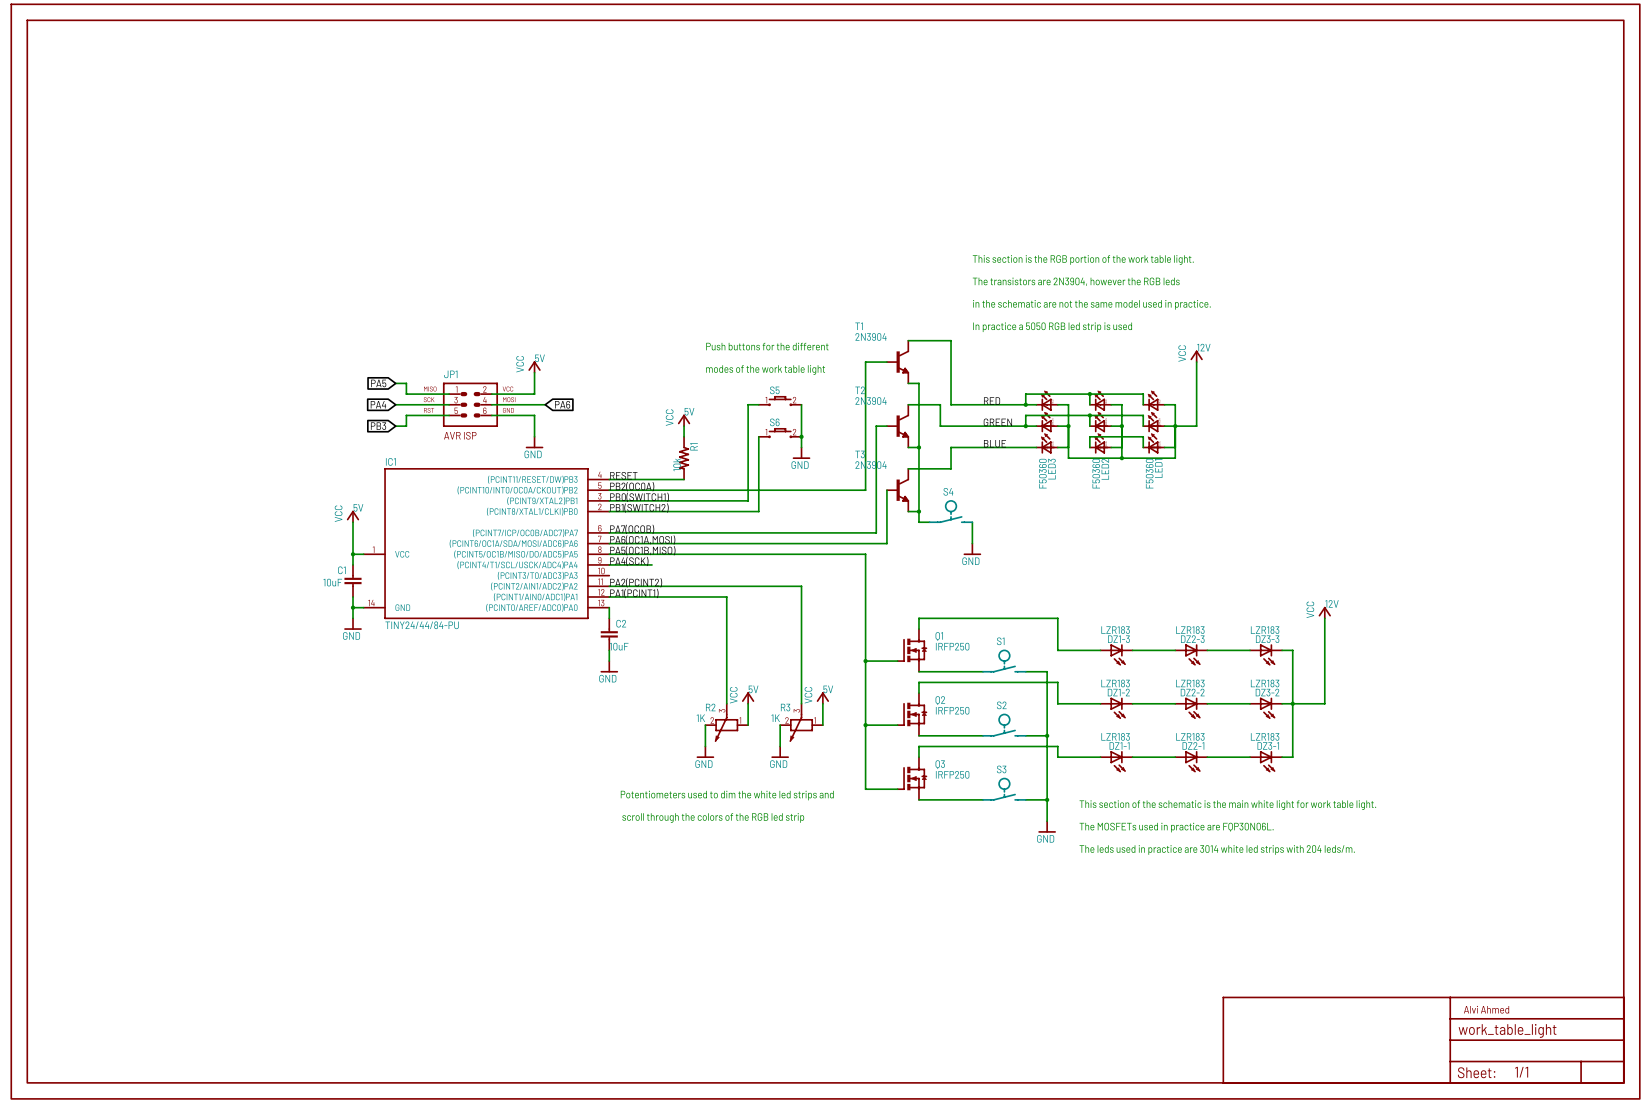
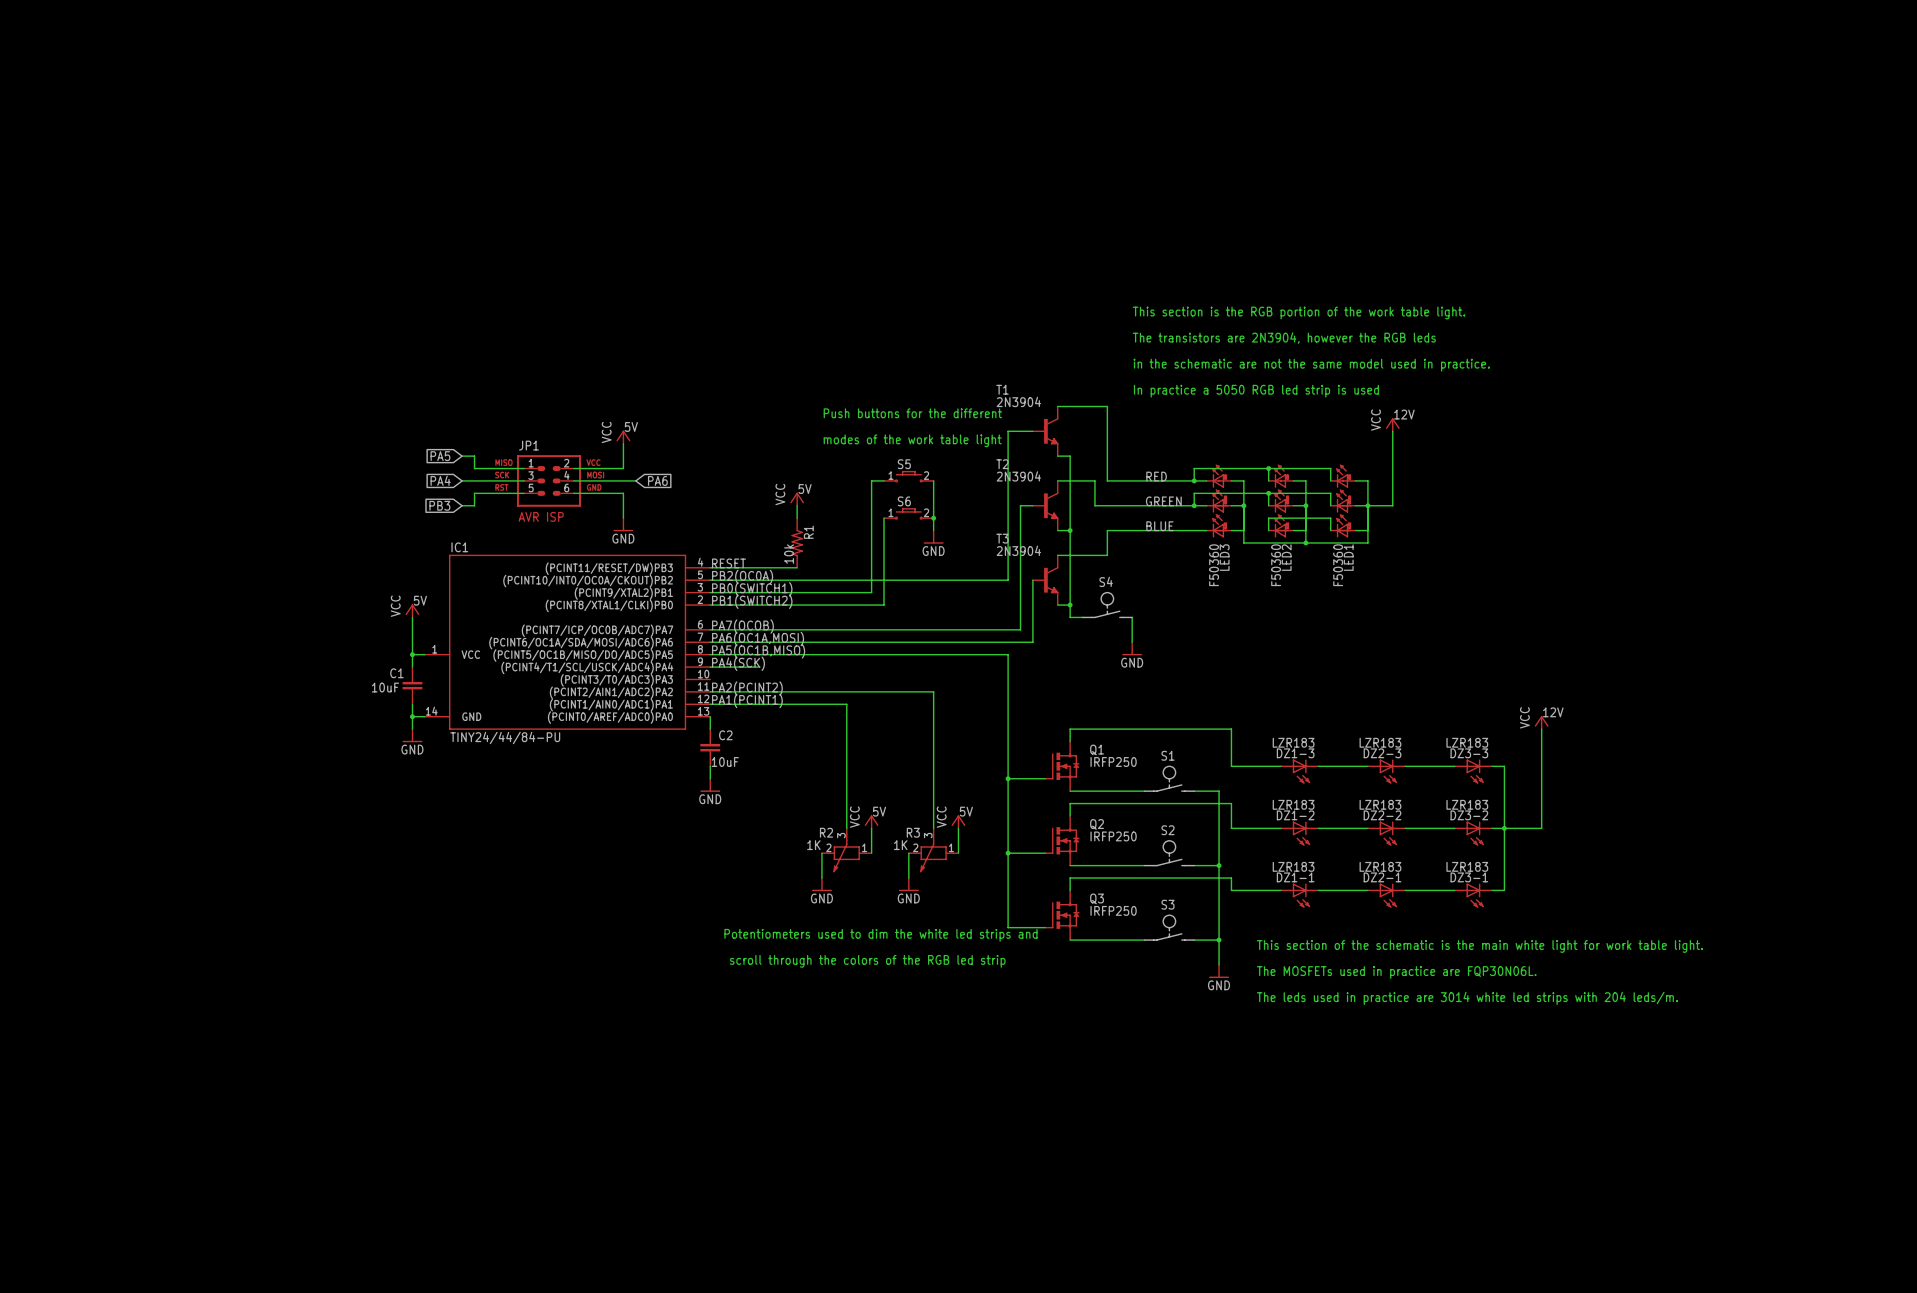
part: (825, 551) -> none

